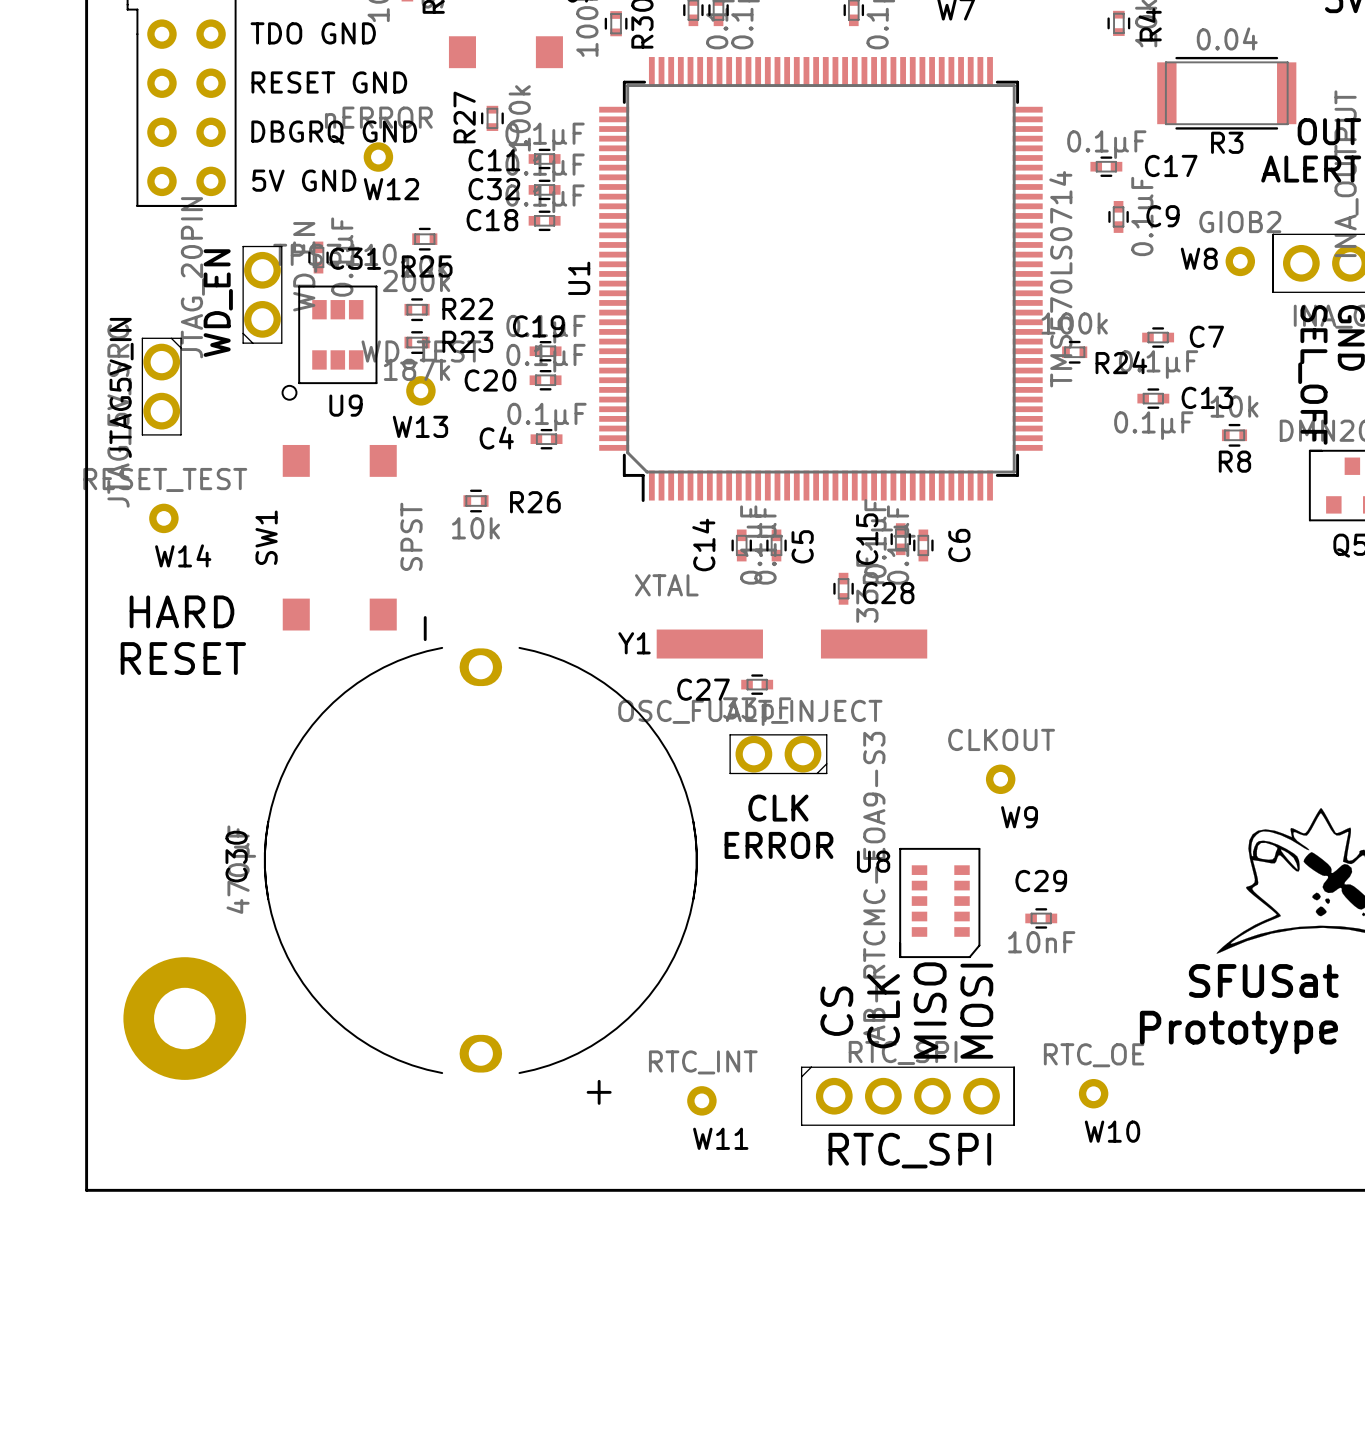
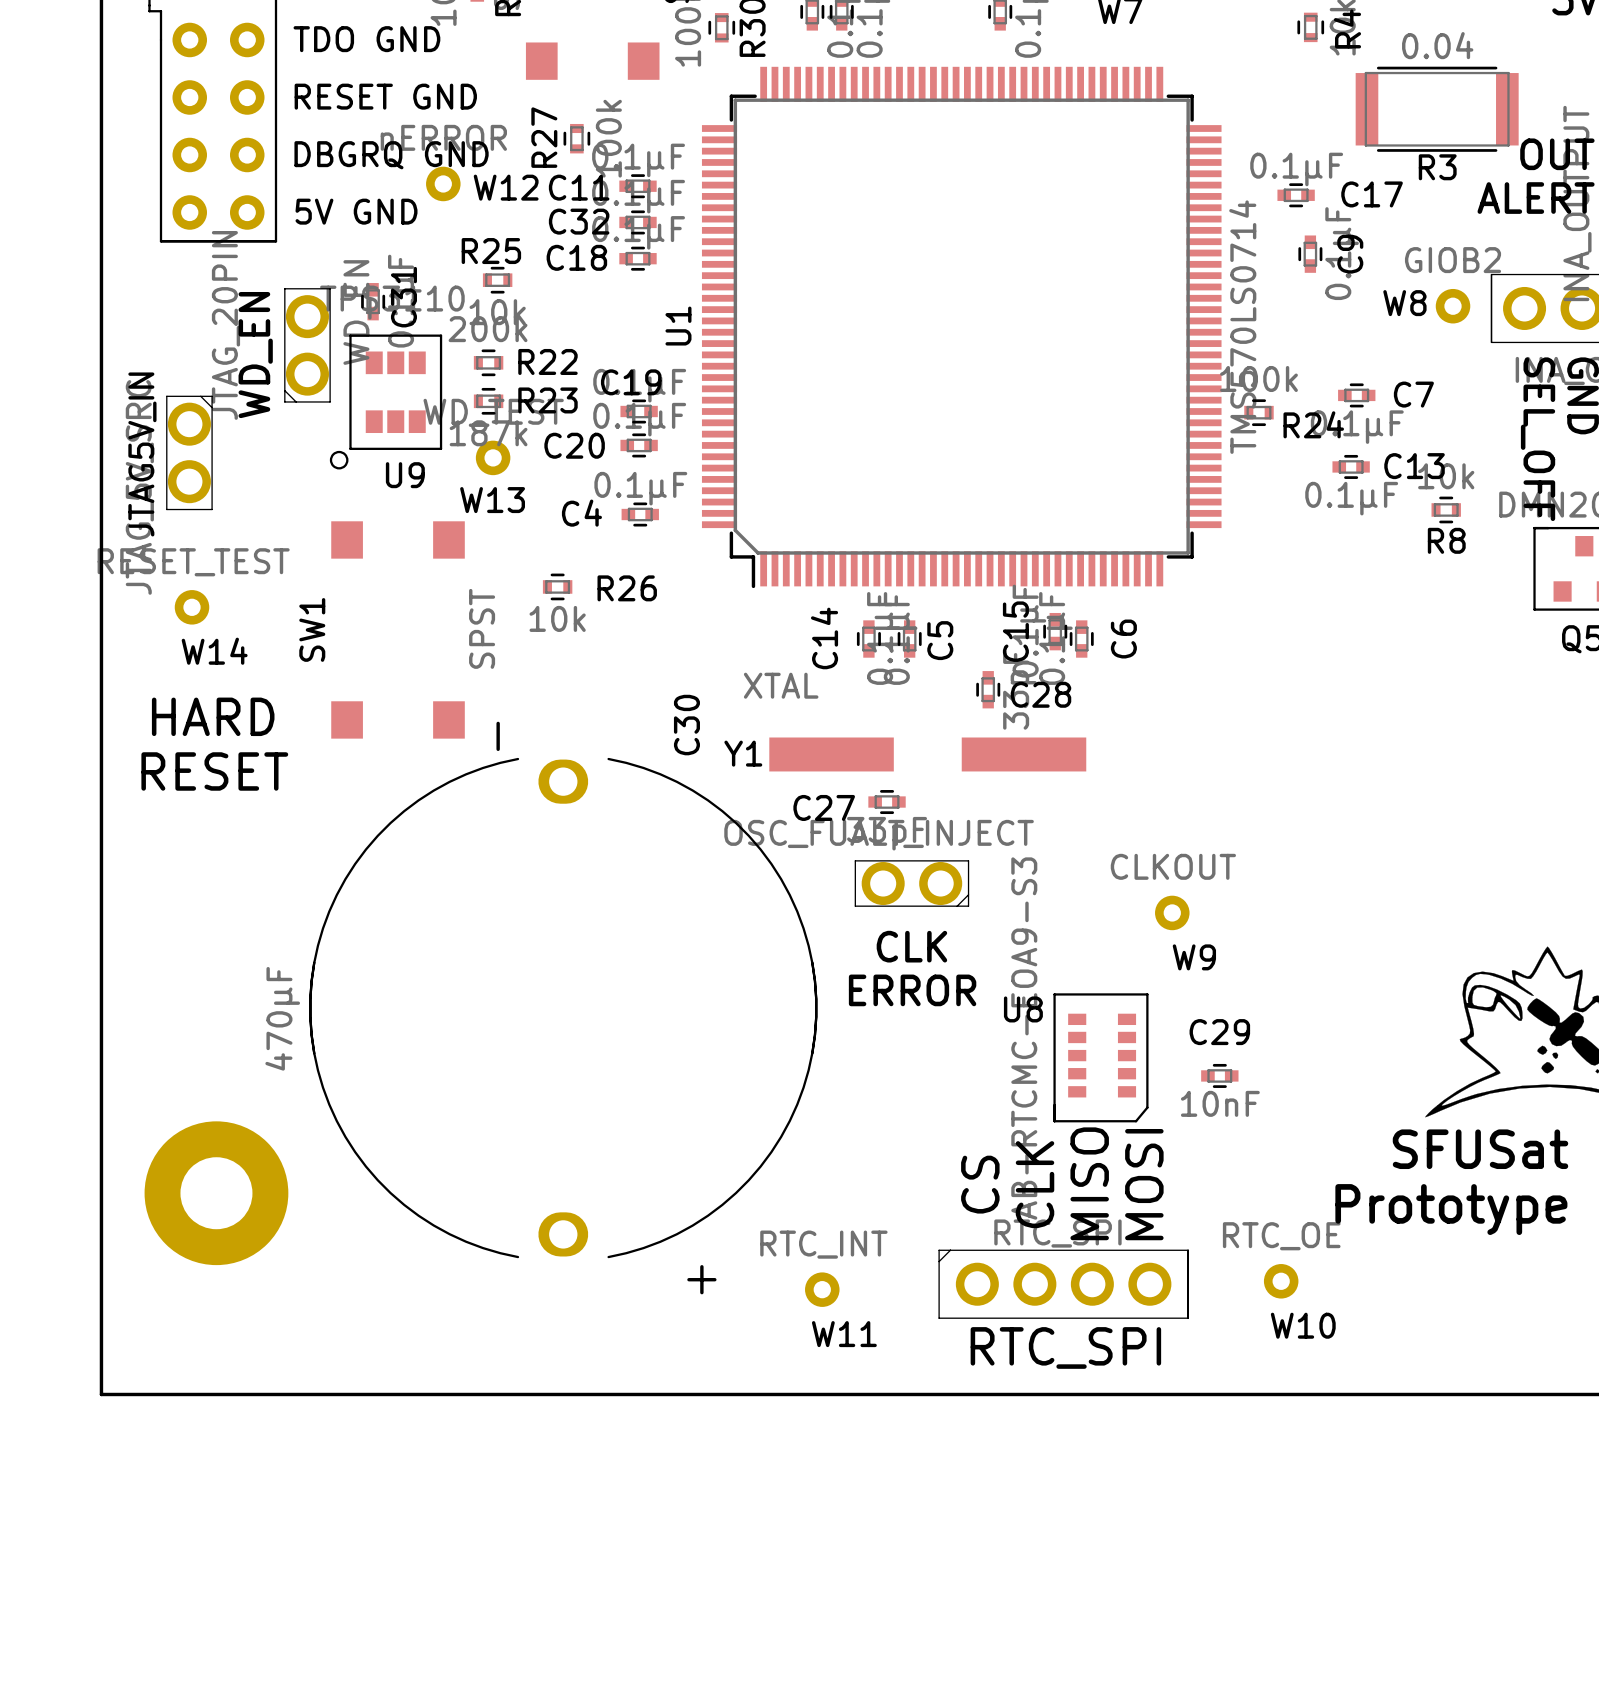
W12 name position: W12 (391, 189) -> W12 (506, 187)
C9 name rotation: 0° (1163, 216) -> 90° counterclockwise (1350, 254)
C31 name rotation: 0° (355, 258) -> 90° counterclockwise (403, 297)
R25 name position: R25 (427, 266) -> R25 (491, 251)
C30 name position: C30 (236, 856) -> C30 (686, 725)

